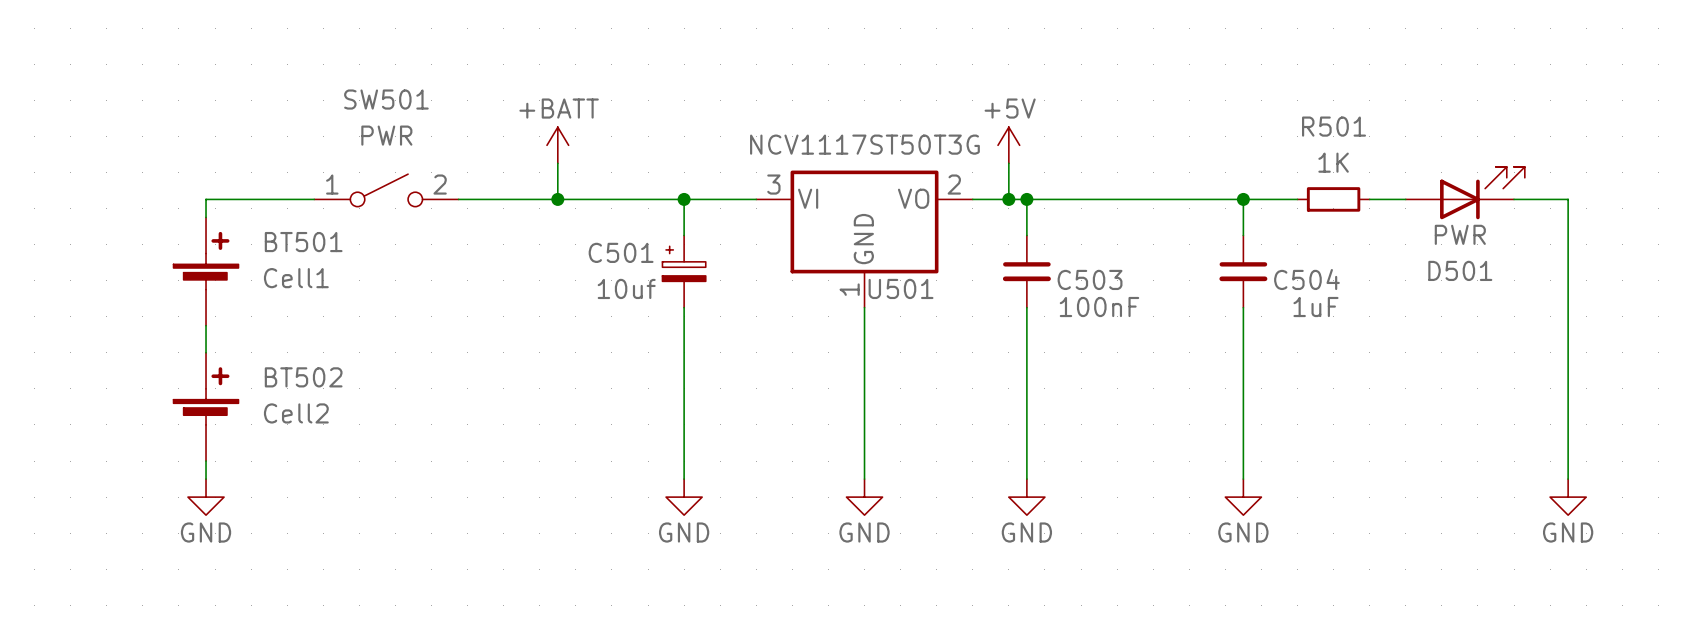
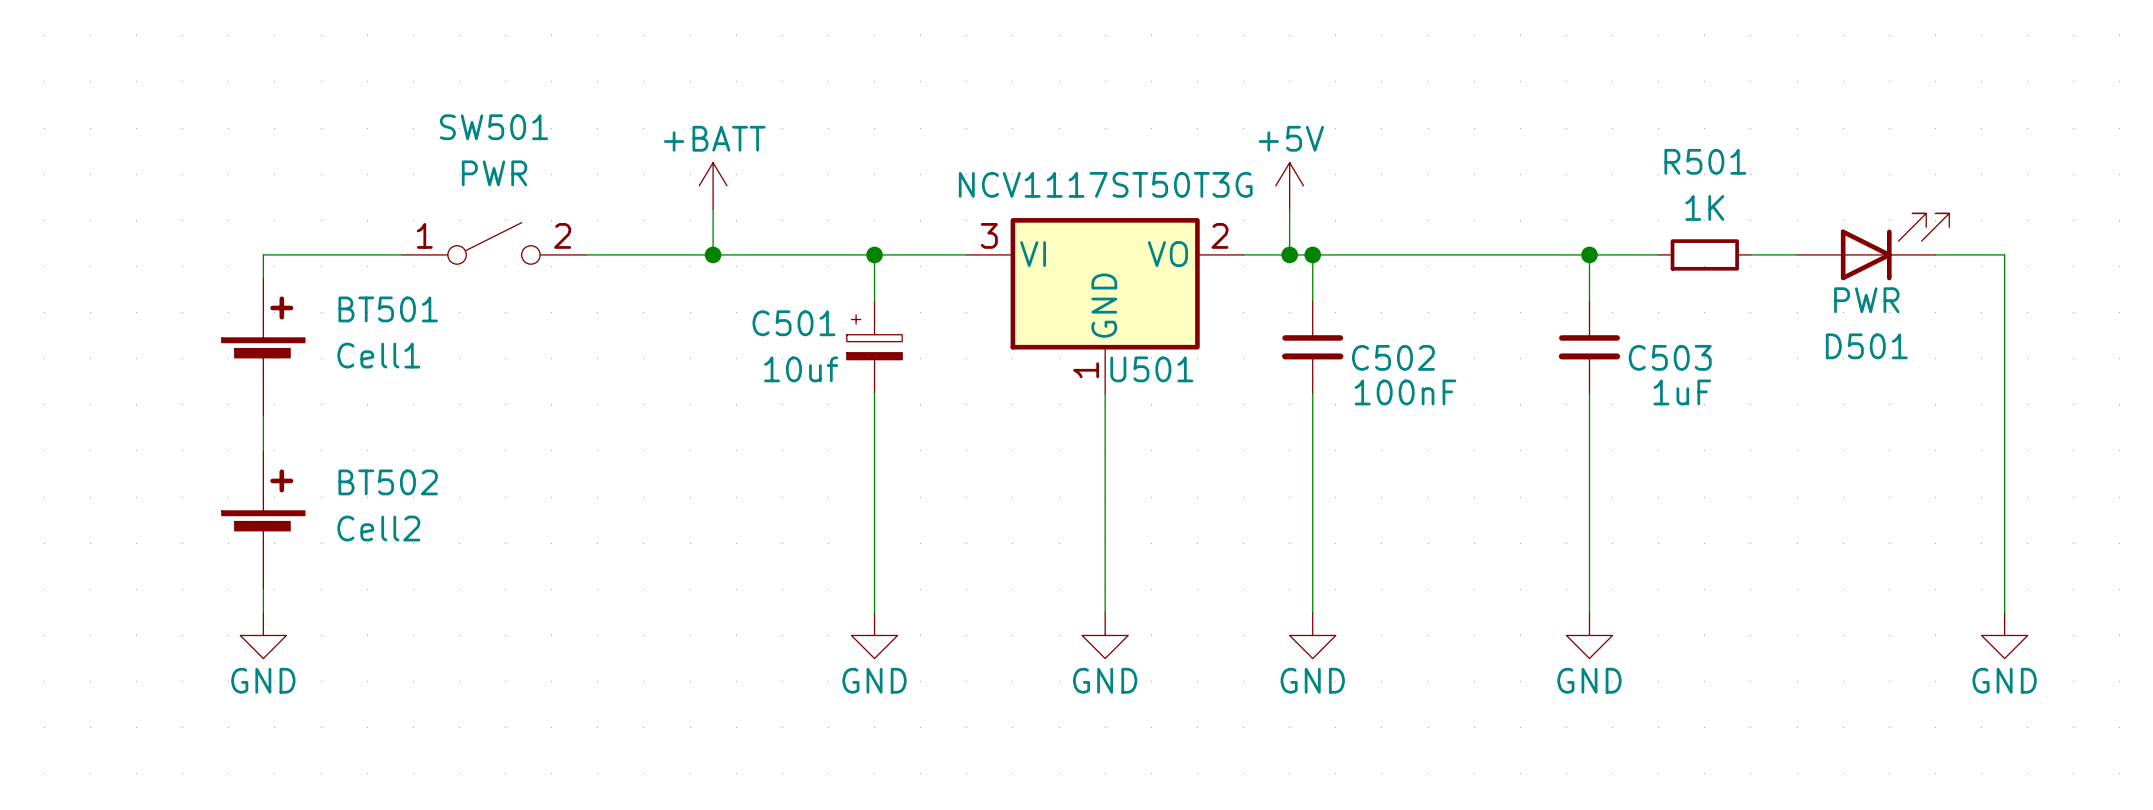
C503 name: C503 (1090, 279) -> C502 (1393, 357)
C504 name: C504 (1306, 279) -> C503 (1670, 357)

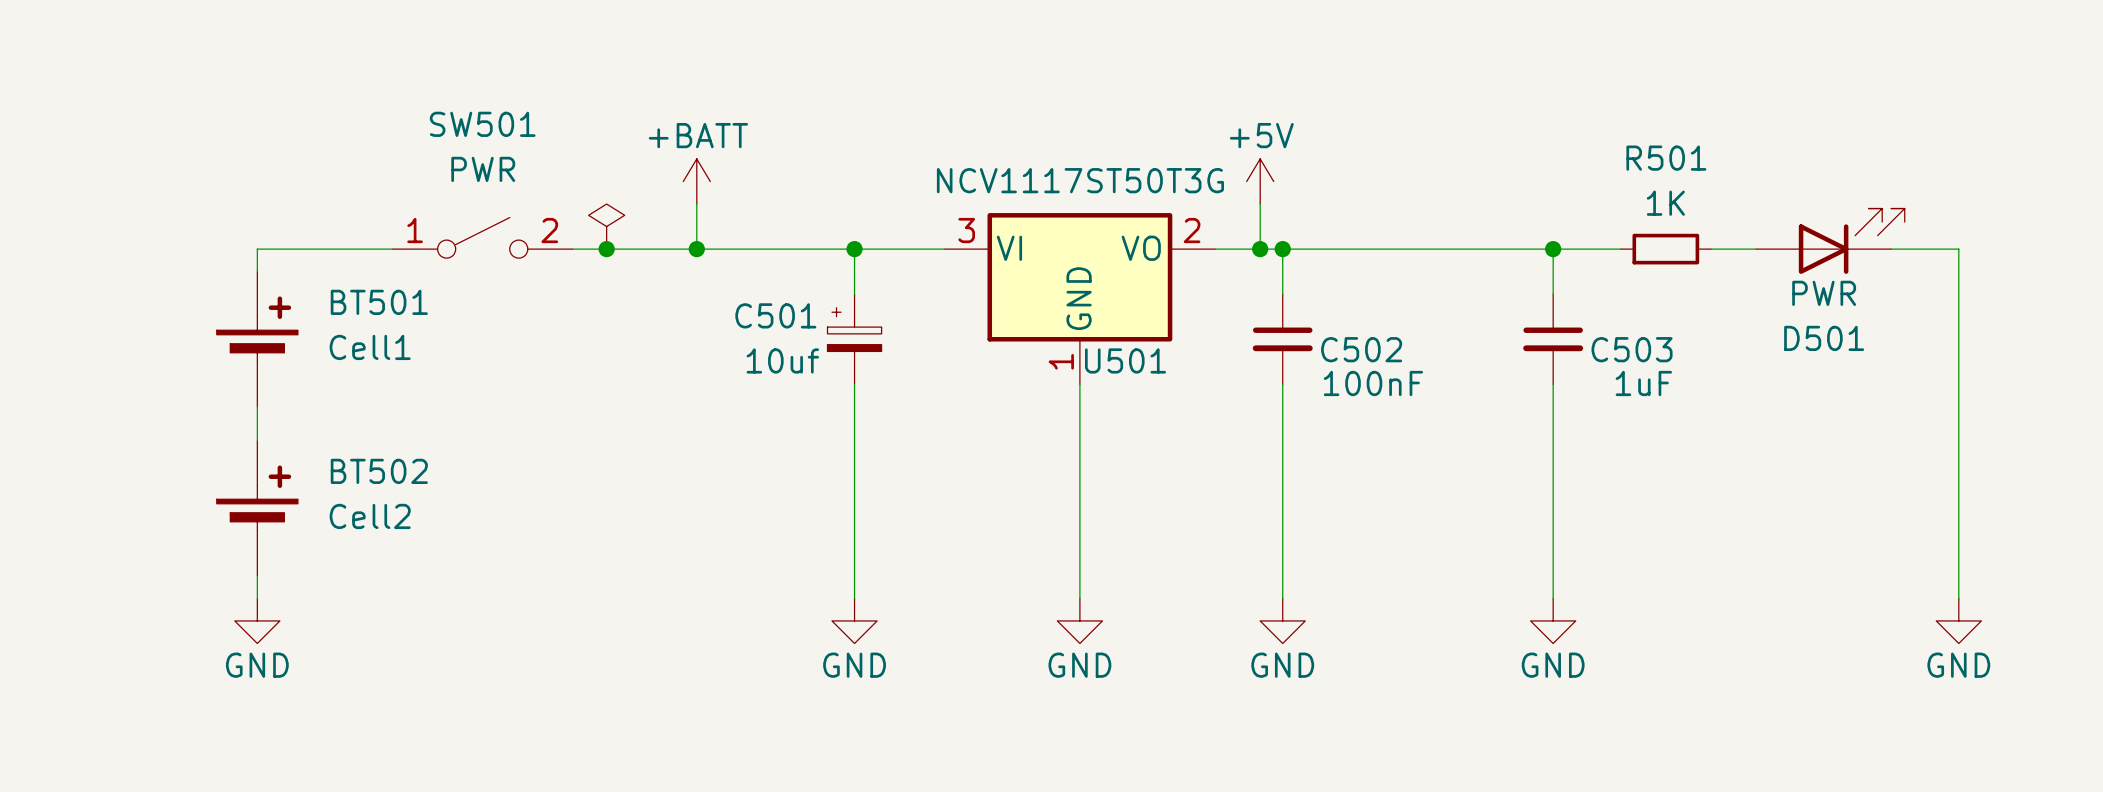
power symbol: none -> (606, 226)
junction: none -> (606, 249)
BT501 symbol: [221, 278, 305, 417] -> [216, 271, 298, 407]
BT502 symbol: [221, 450, 305, 590] -> [216, 440, 298, 576]

